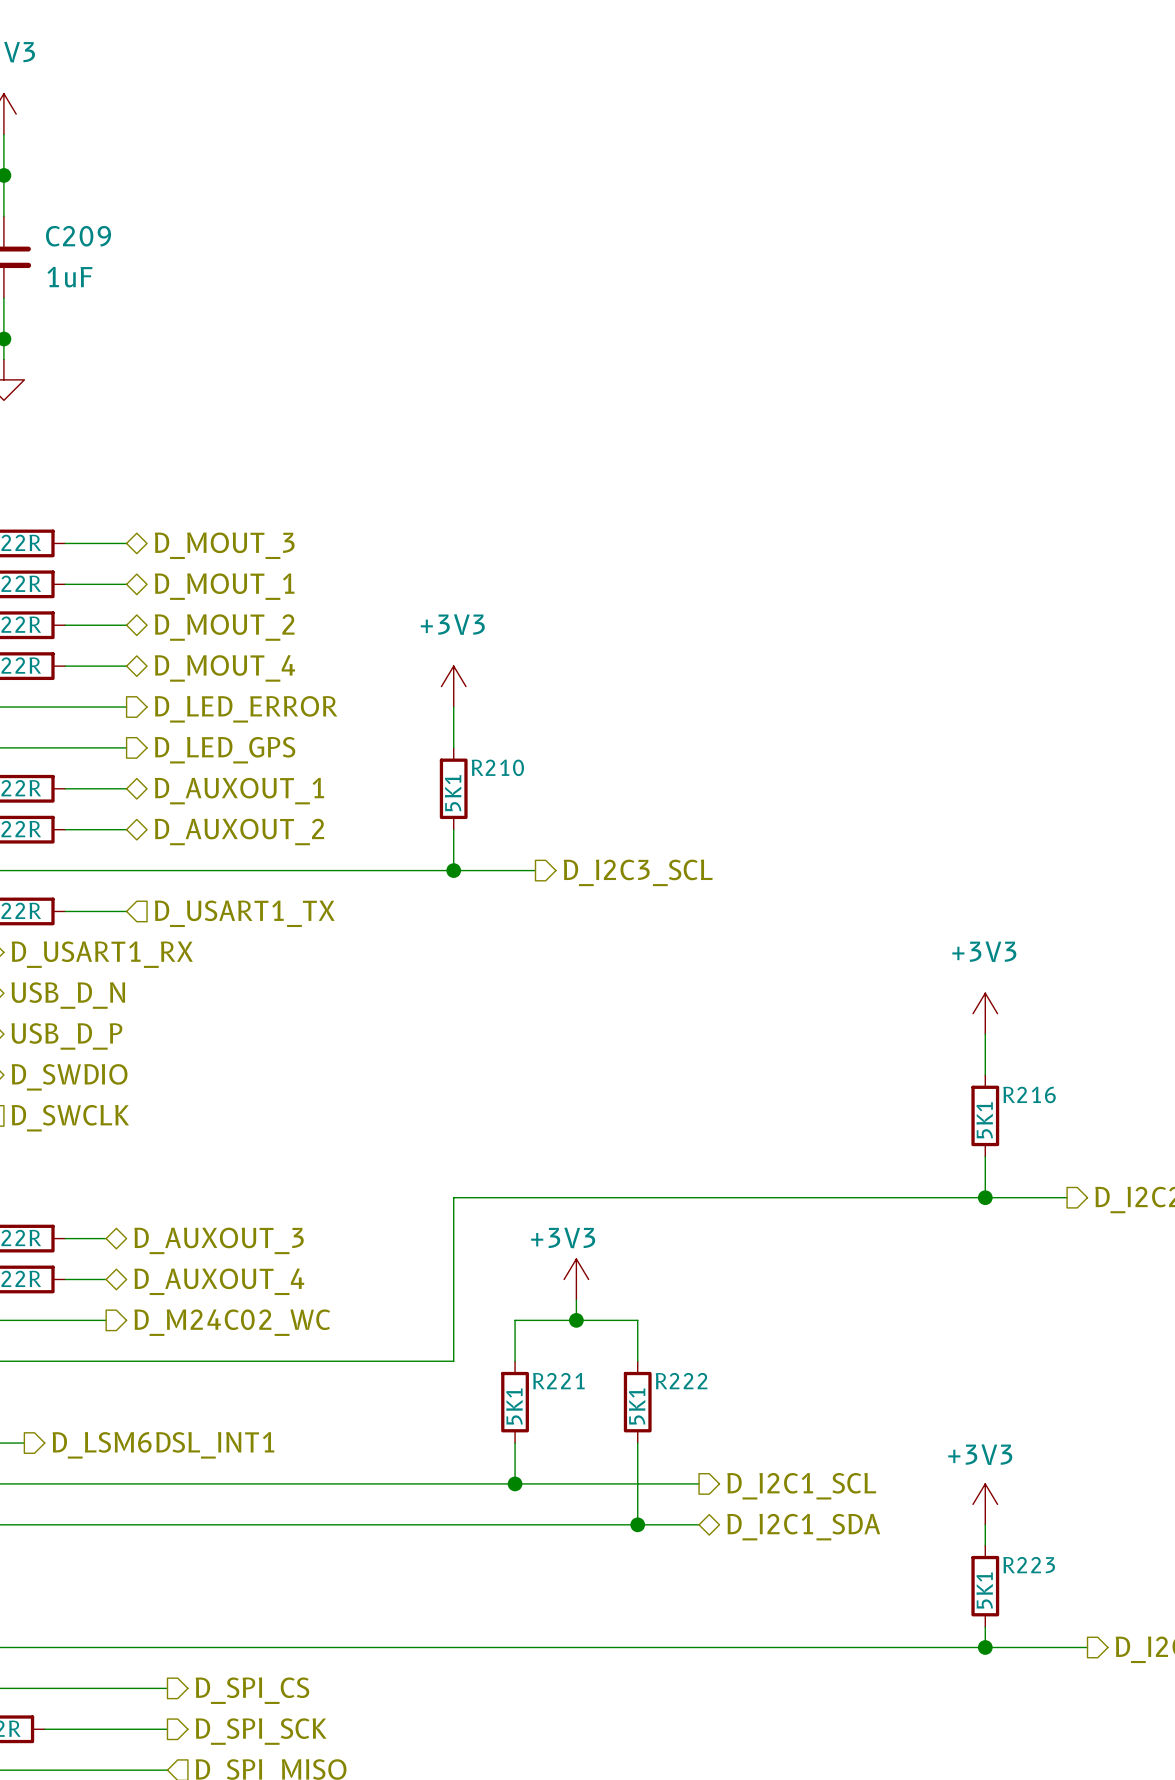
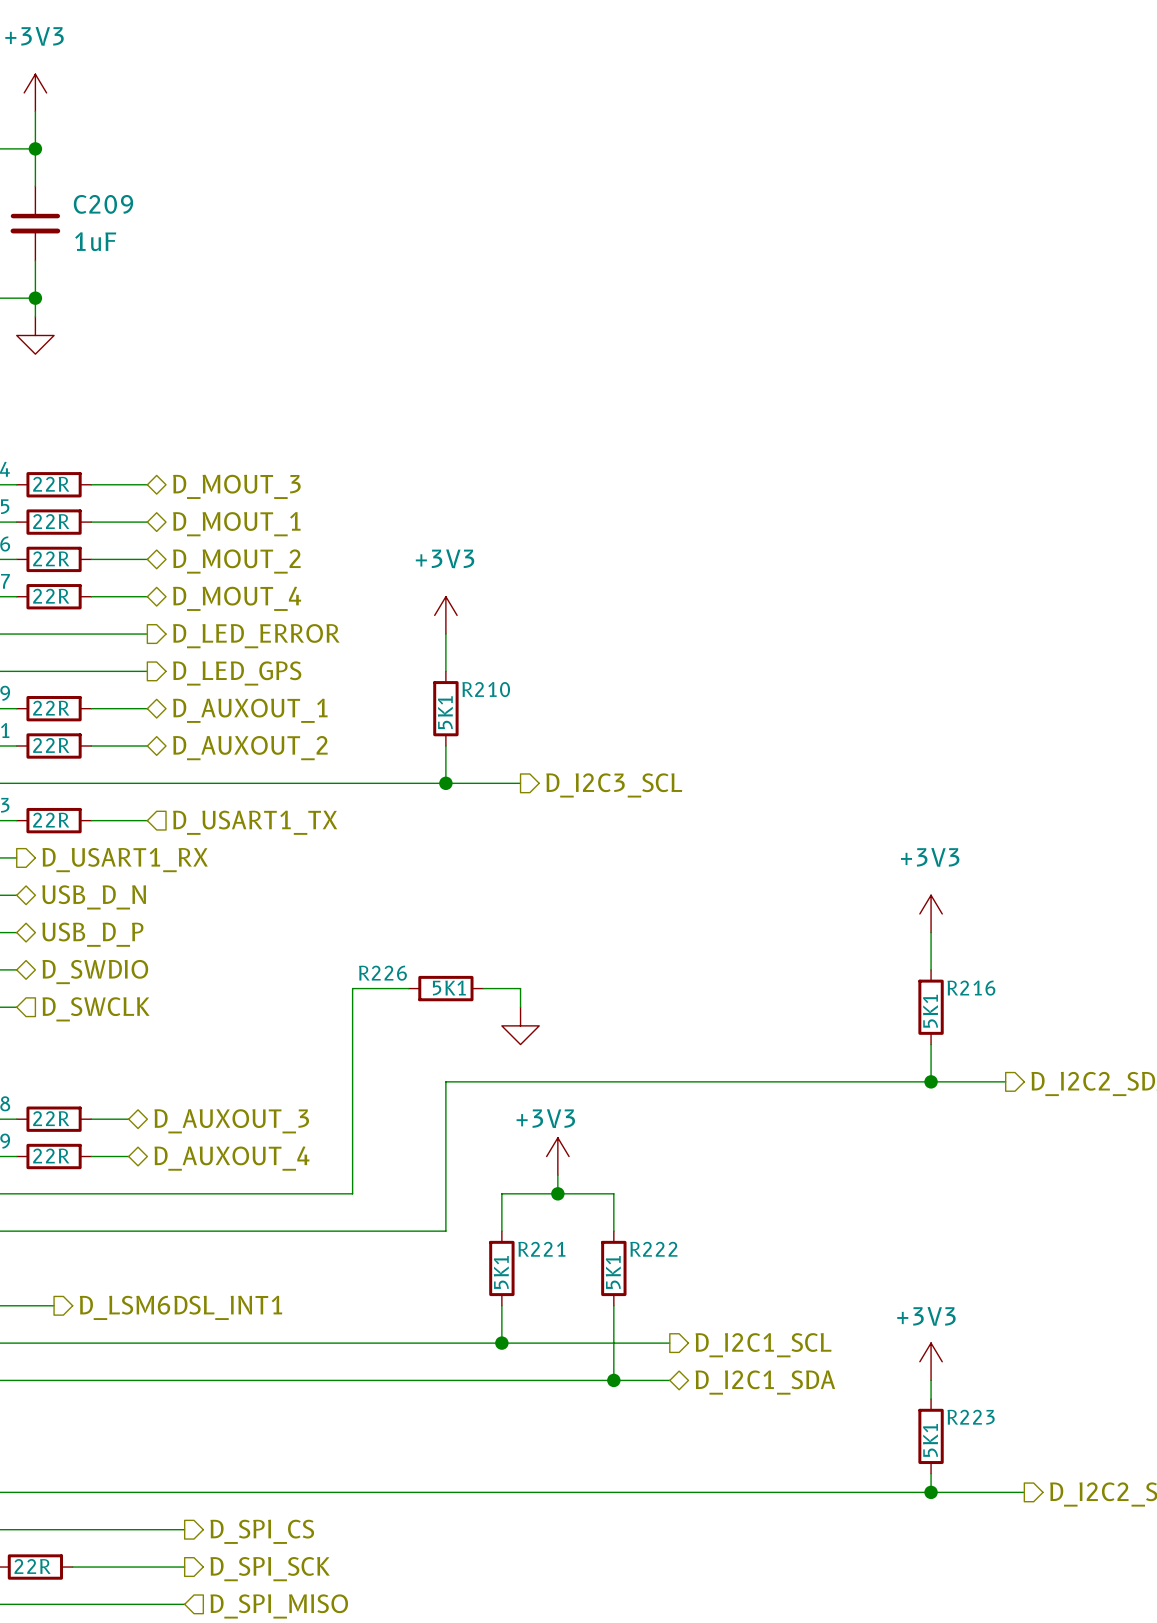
wire: none -> (408, 988) (352, 988) (352, 1193) (128, 1193)
R226: none -> 5K1 (445, 988)
wire: none -> (483, 988) (520, 988) (520, 1007)
power symbol: none -> (520, 1025)
hierarchical label: D_M24C02_WC (232, 1322) -> none

